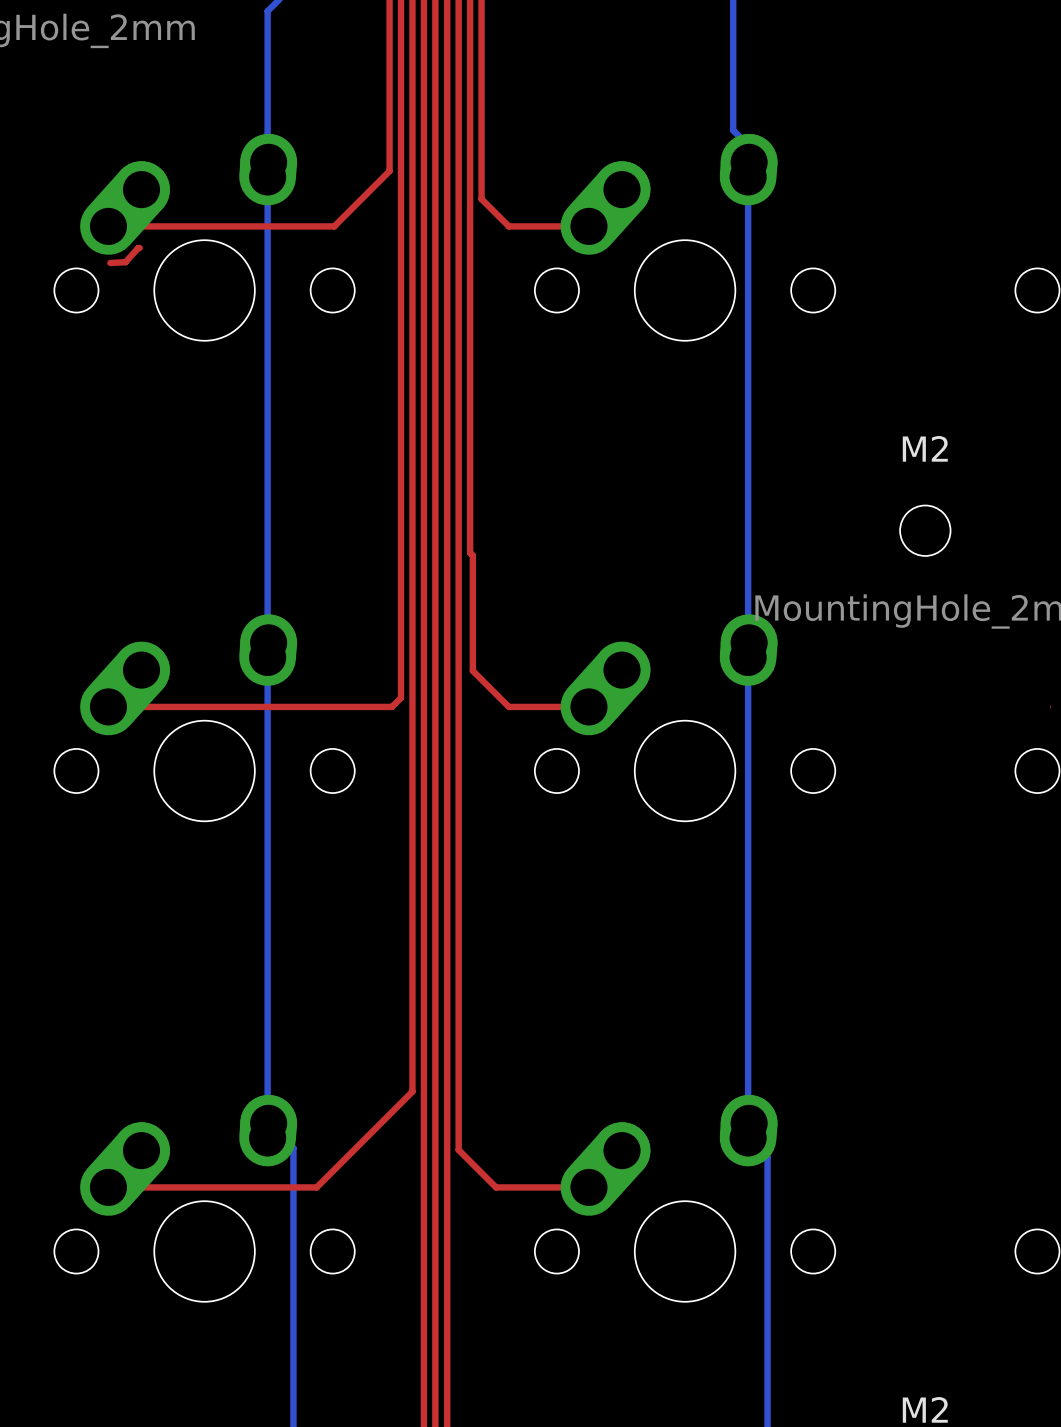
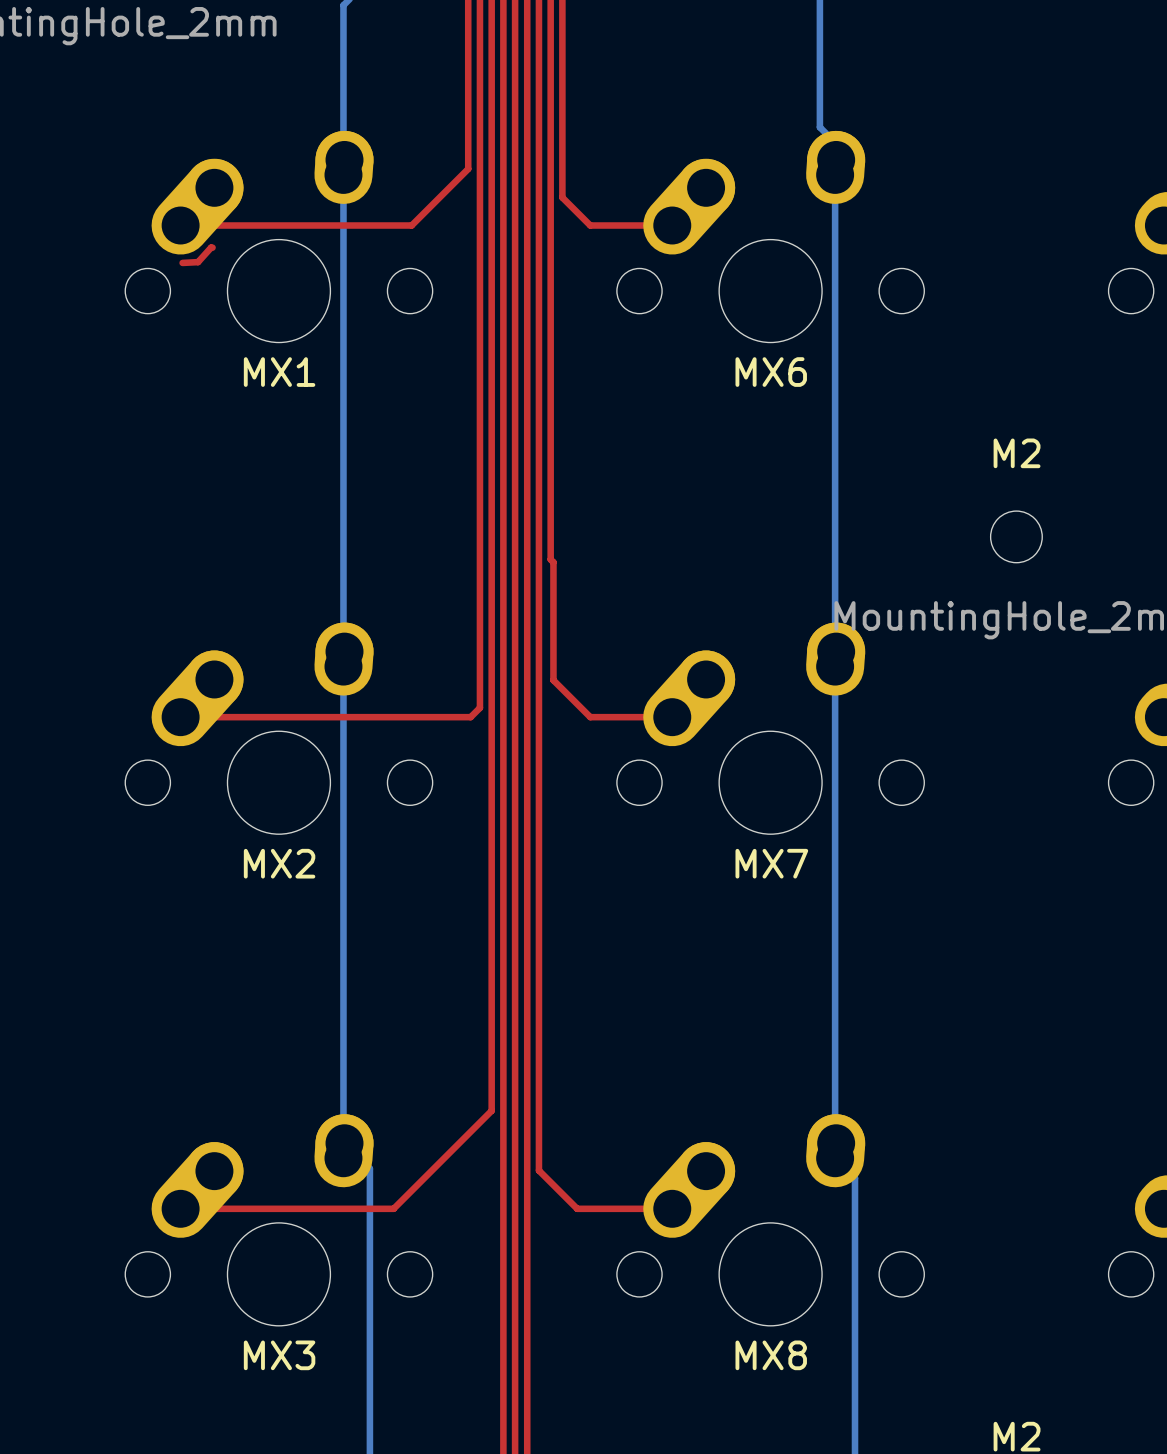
MX1 name: none -> MX1 (279, 372)
MX6 name: none -> MX6 (771, 372)
MX2 name: none -> MX2 (279, 863)
MX7 name: none -> MX7 (771, 863)
MX3 name: none -> MX3 (279, 1355)
MX8 name: none -> MX8 (771, 1355)

